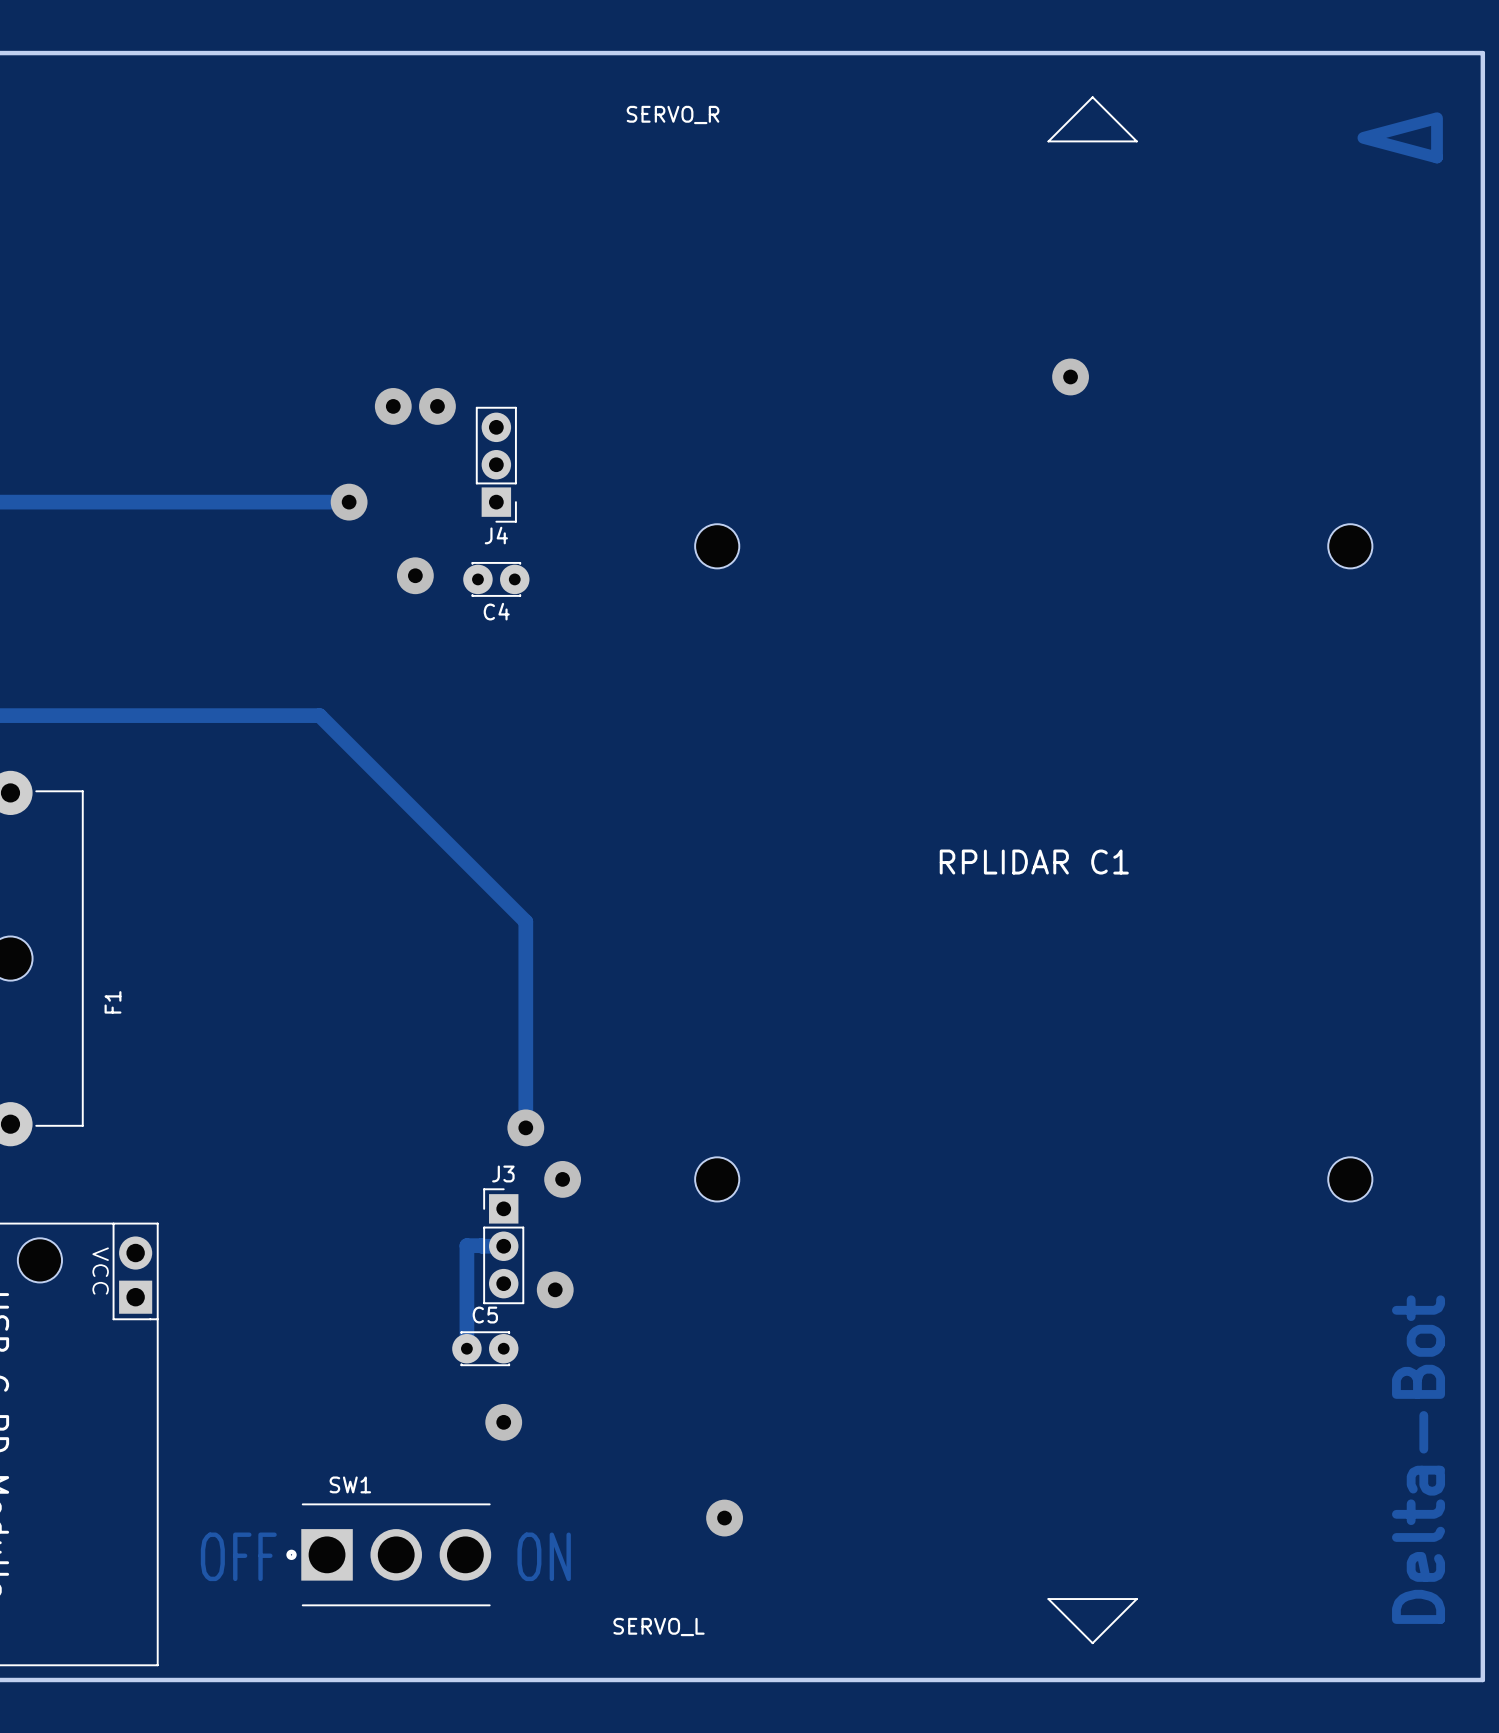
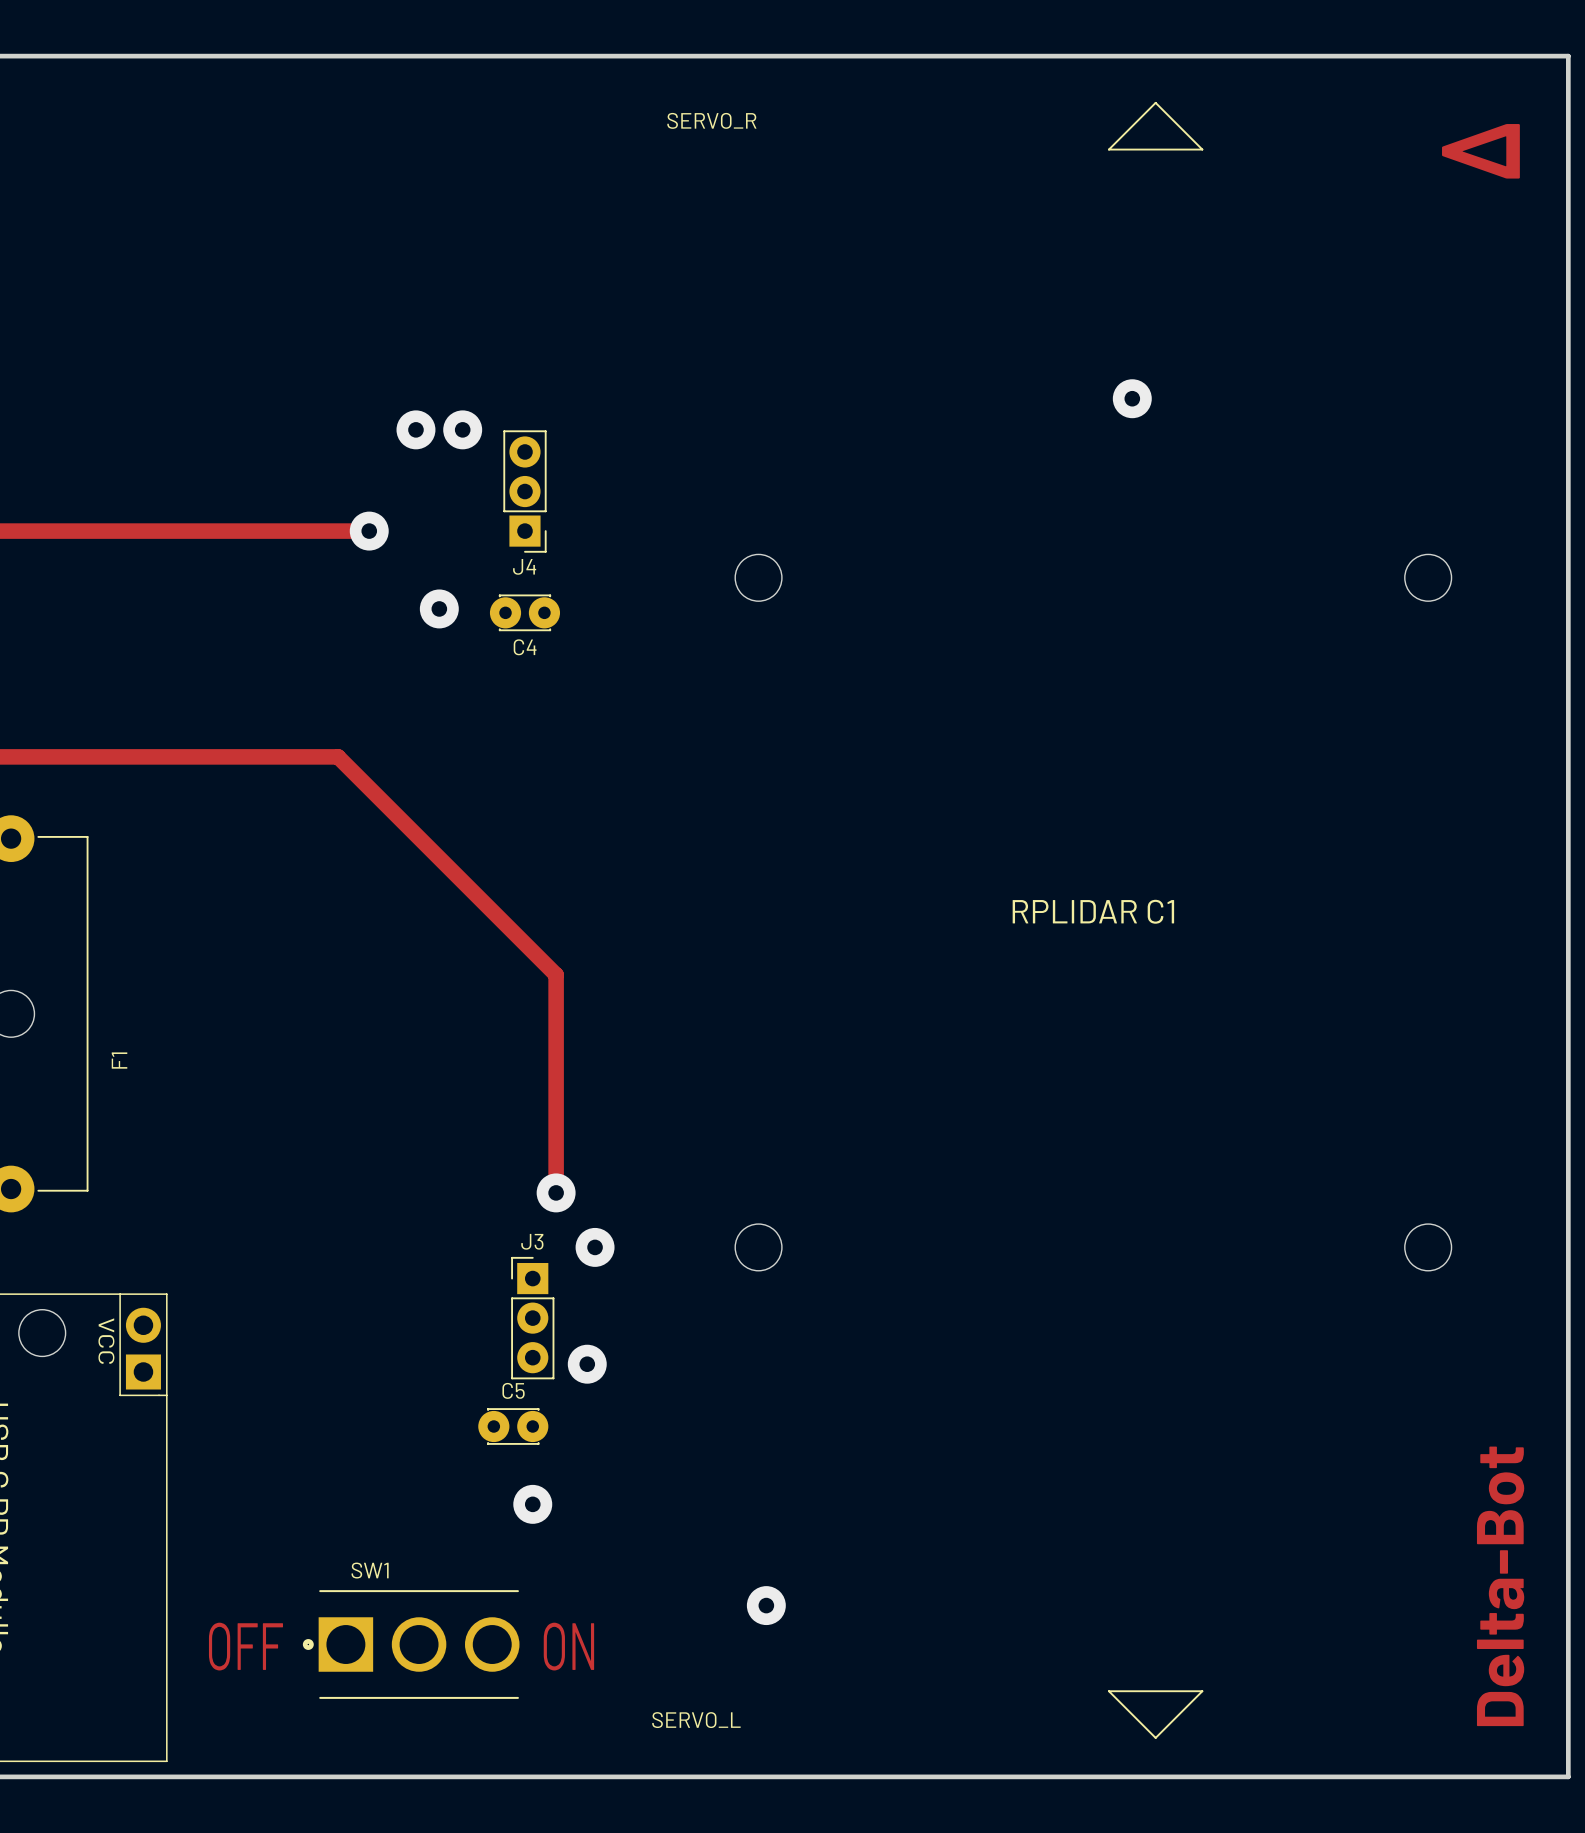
track: (503, 1246) (466, 1245) (466, 1348) -> none

